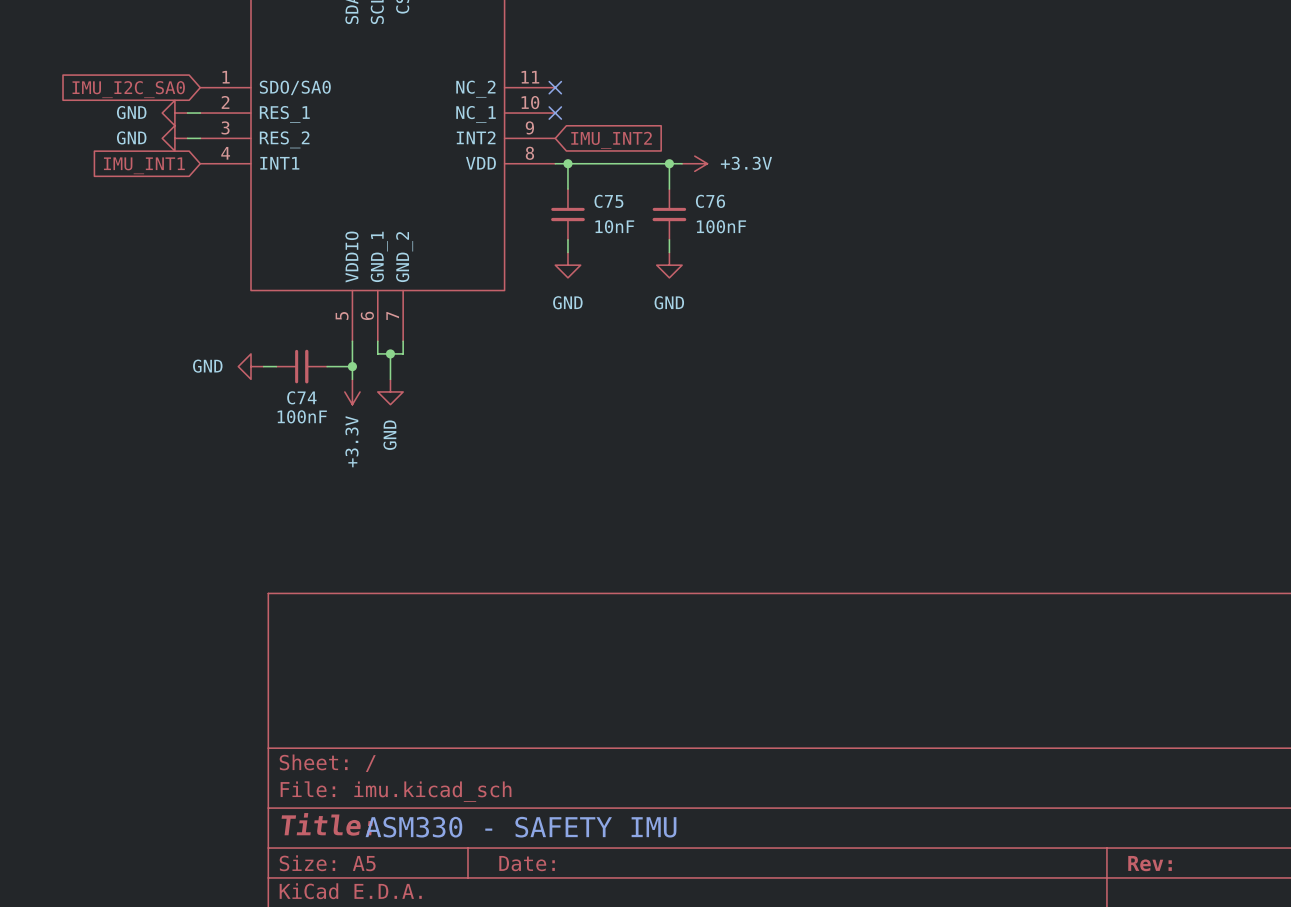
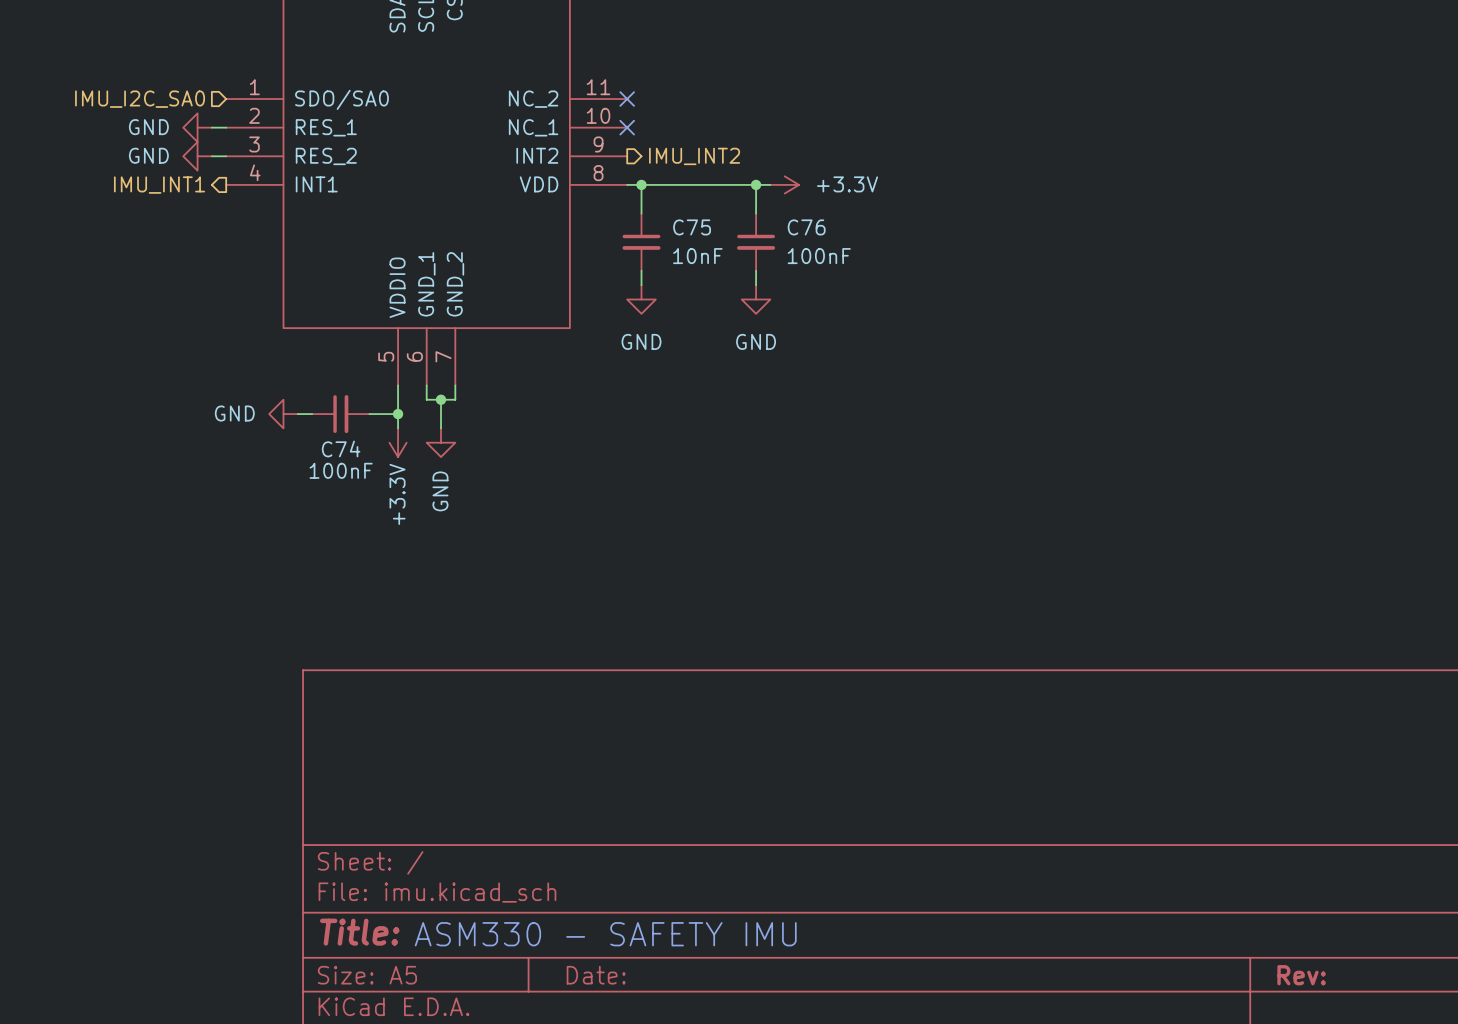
hierarchical label: none -> IMU_I2C_SA0 (140, 99)
global label: IMU_I2C_SA0 (128, 89) -> none
hierarchical label: none -> IMU_INT2 (694, 156)
global label: IMU_INT2 (611, 140) -> none
hierarchical label: none -> IMU_INT1 (159, 185)
global label: IMU_INT1 (144, 165) -> none

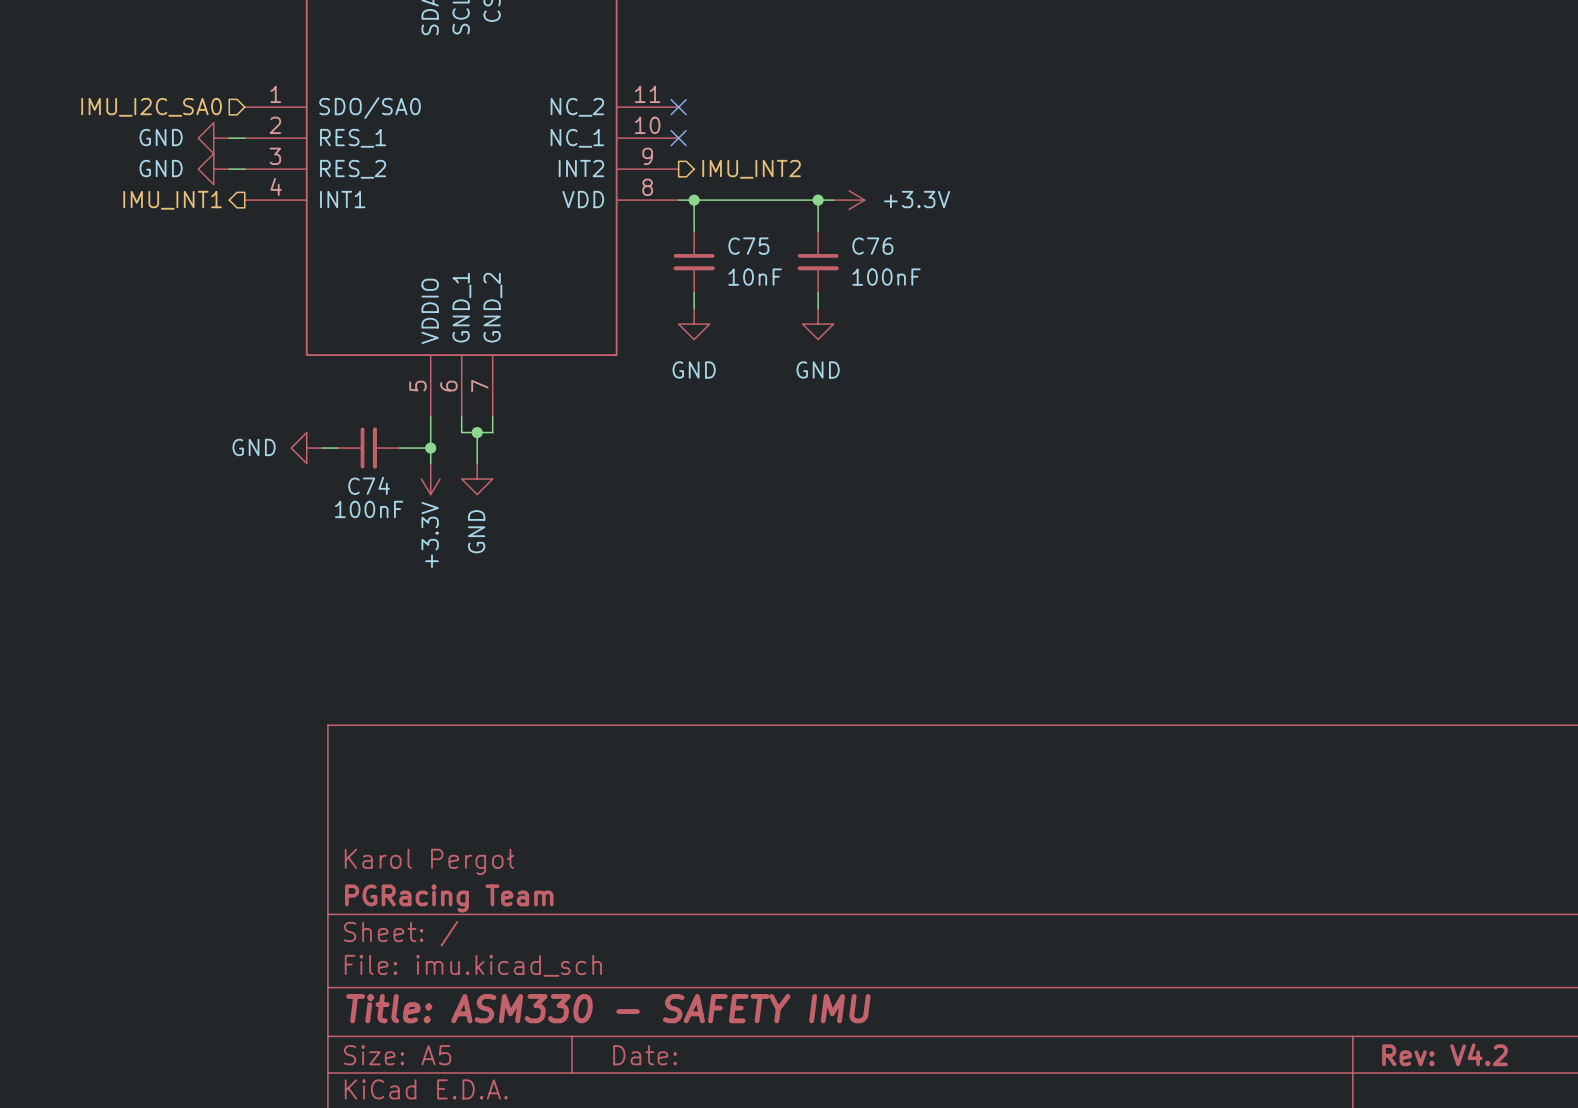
title block: none -> Karol Pergoł (429, 861)
title block: none -> PGRacing Team (449, 898)
title block: Title: (359, 932) -> Title: ASM330 - SAFETY IMU (608, 1008)
text: ASM330 - SAFETY IMU (605, 934) -> none
title block: Rev: (1301, 975) -> Rev: V4.2 (1445, 1054)

